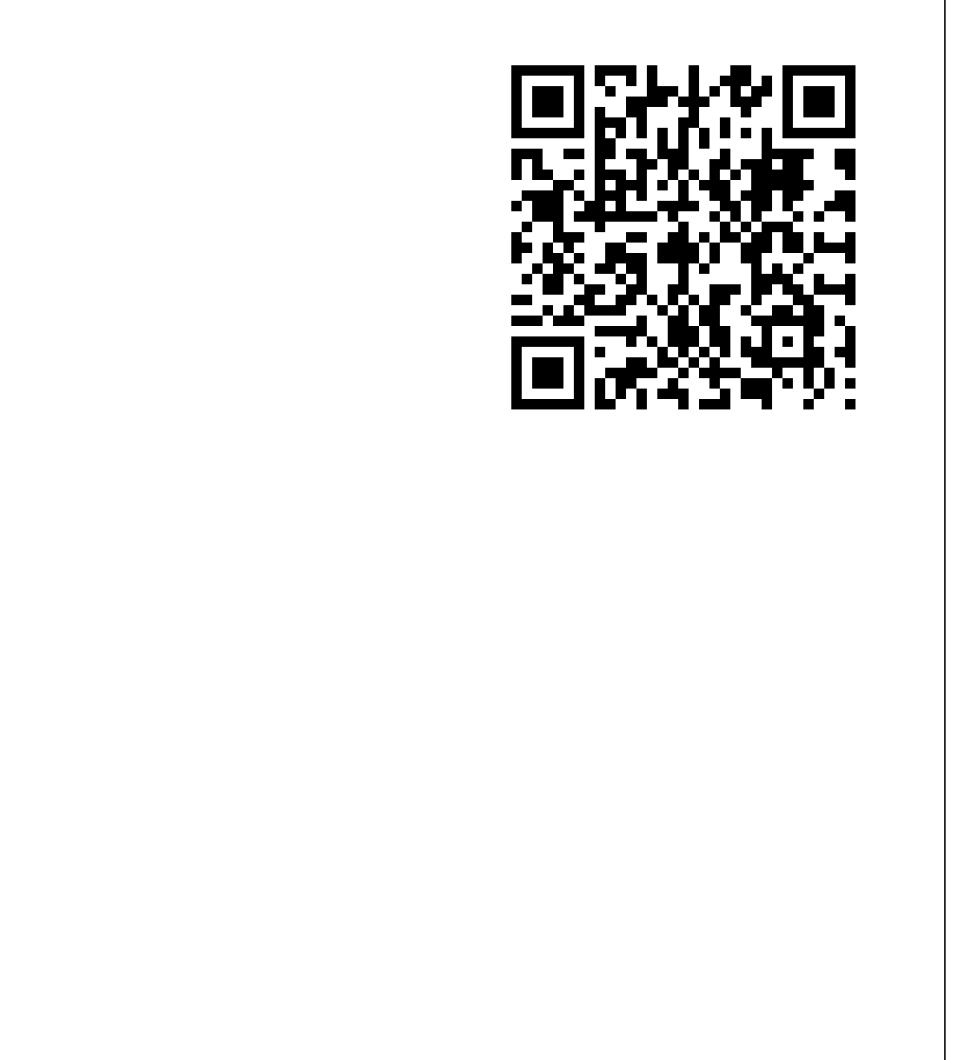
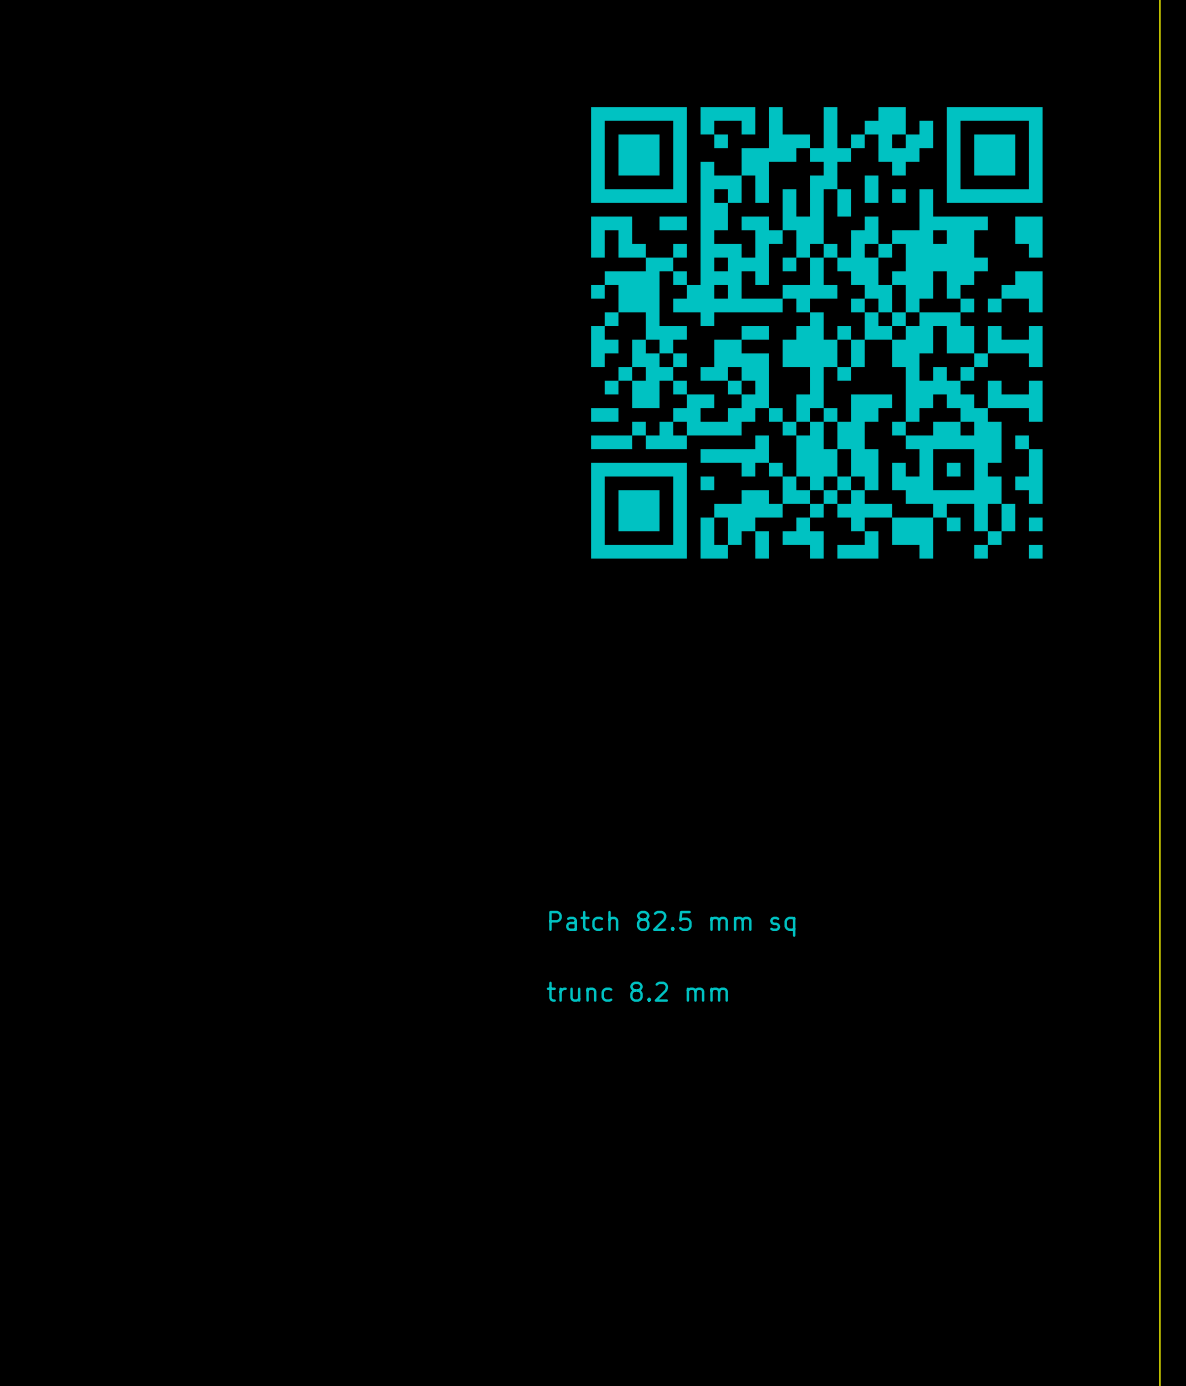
text: none -> Patch 82.5 mm sq (672, 923)
text: none -> trunc 8.2 mm (637, 991)

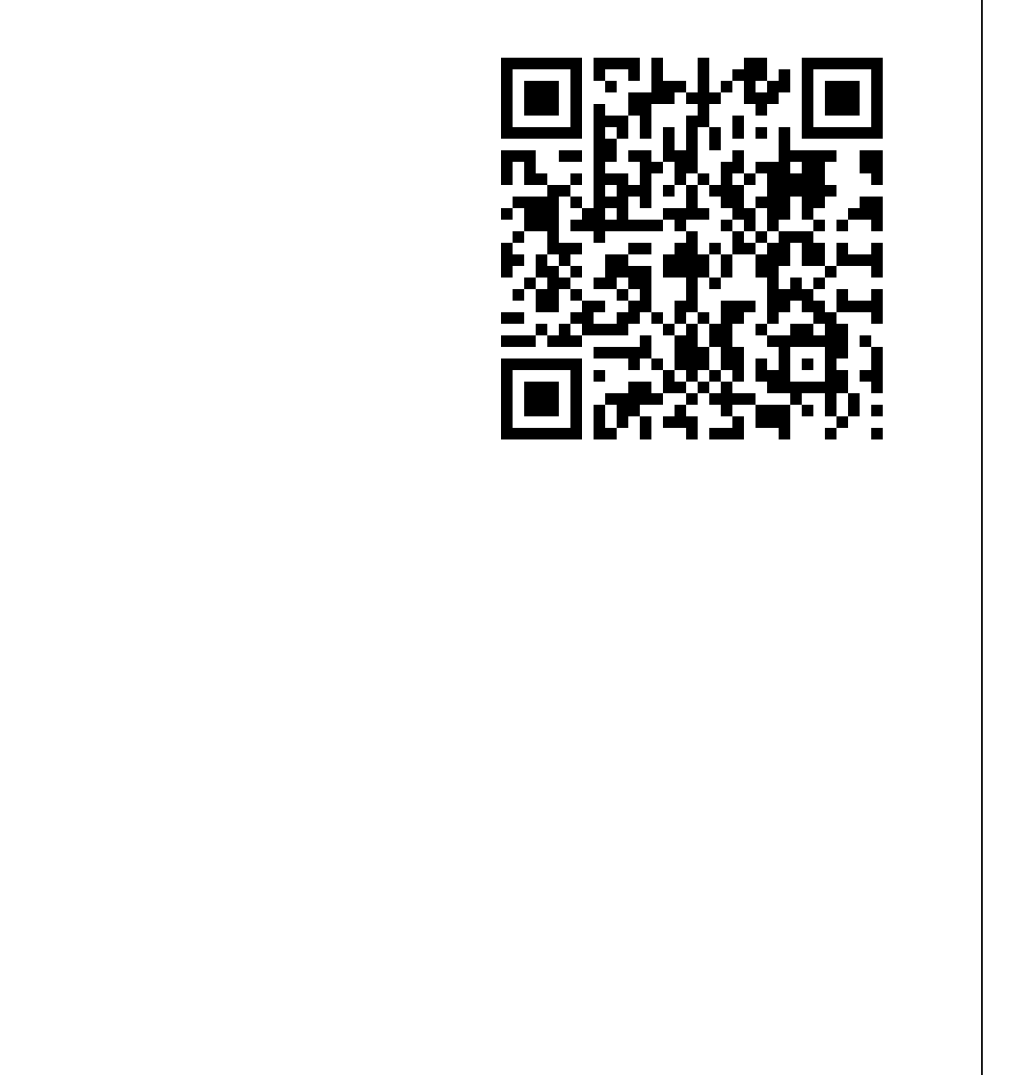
text: Patch 82.5 mm sq (672, 923) -> none
text: trunc 8.2 mm (637, 991) -> none

